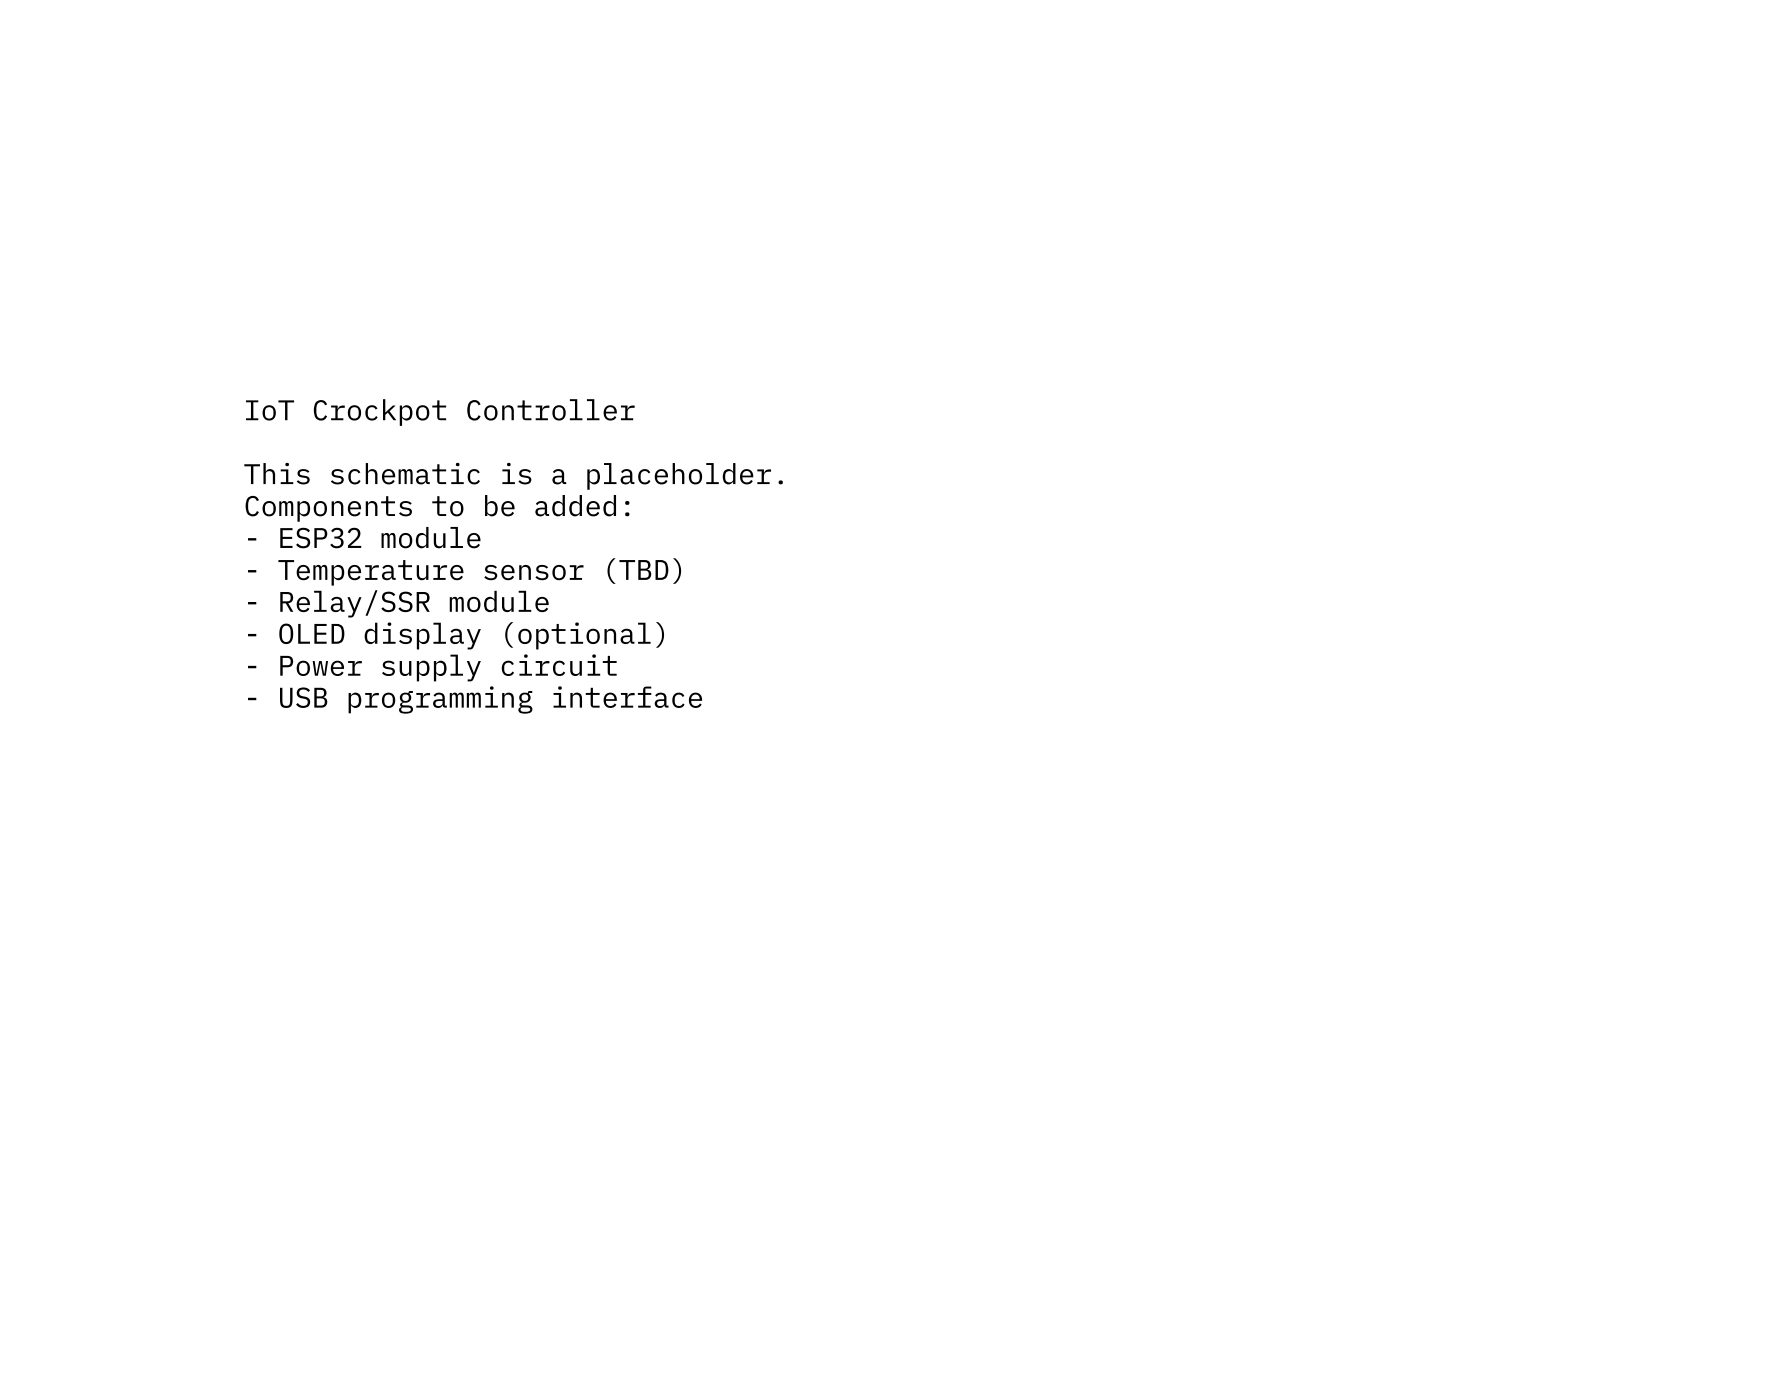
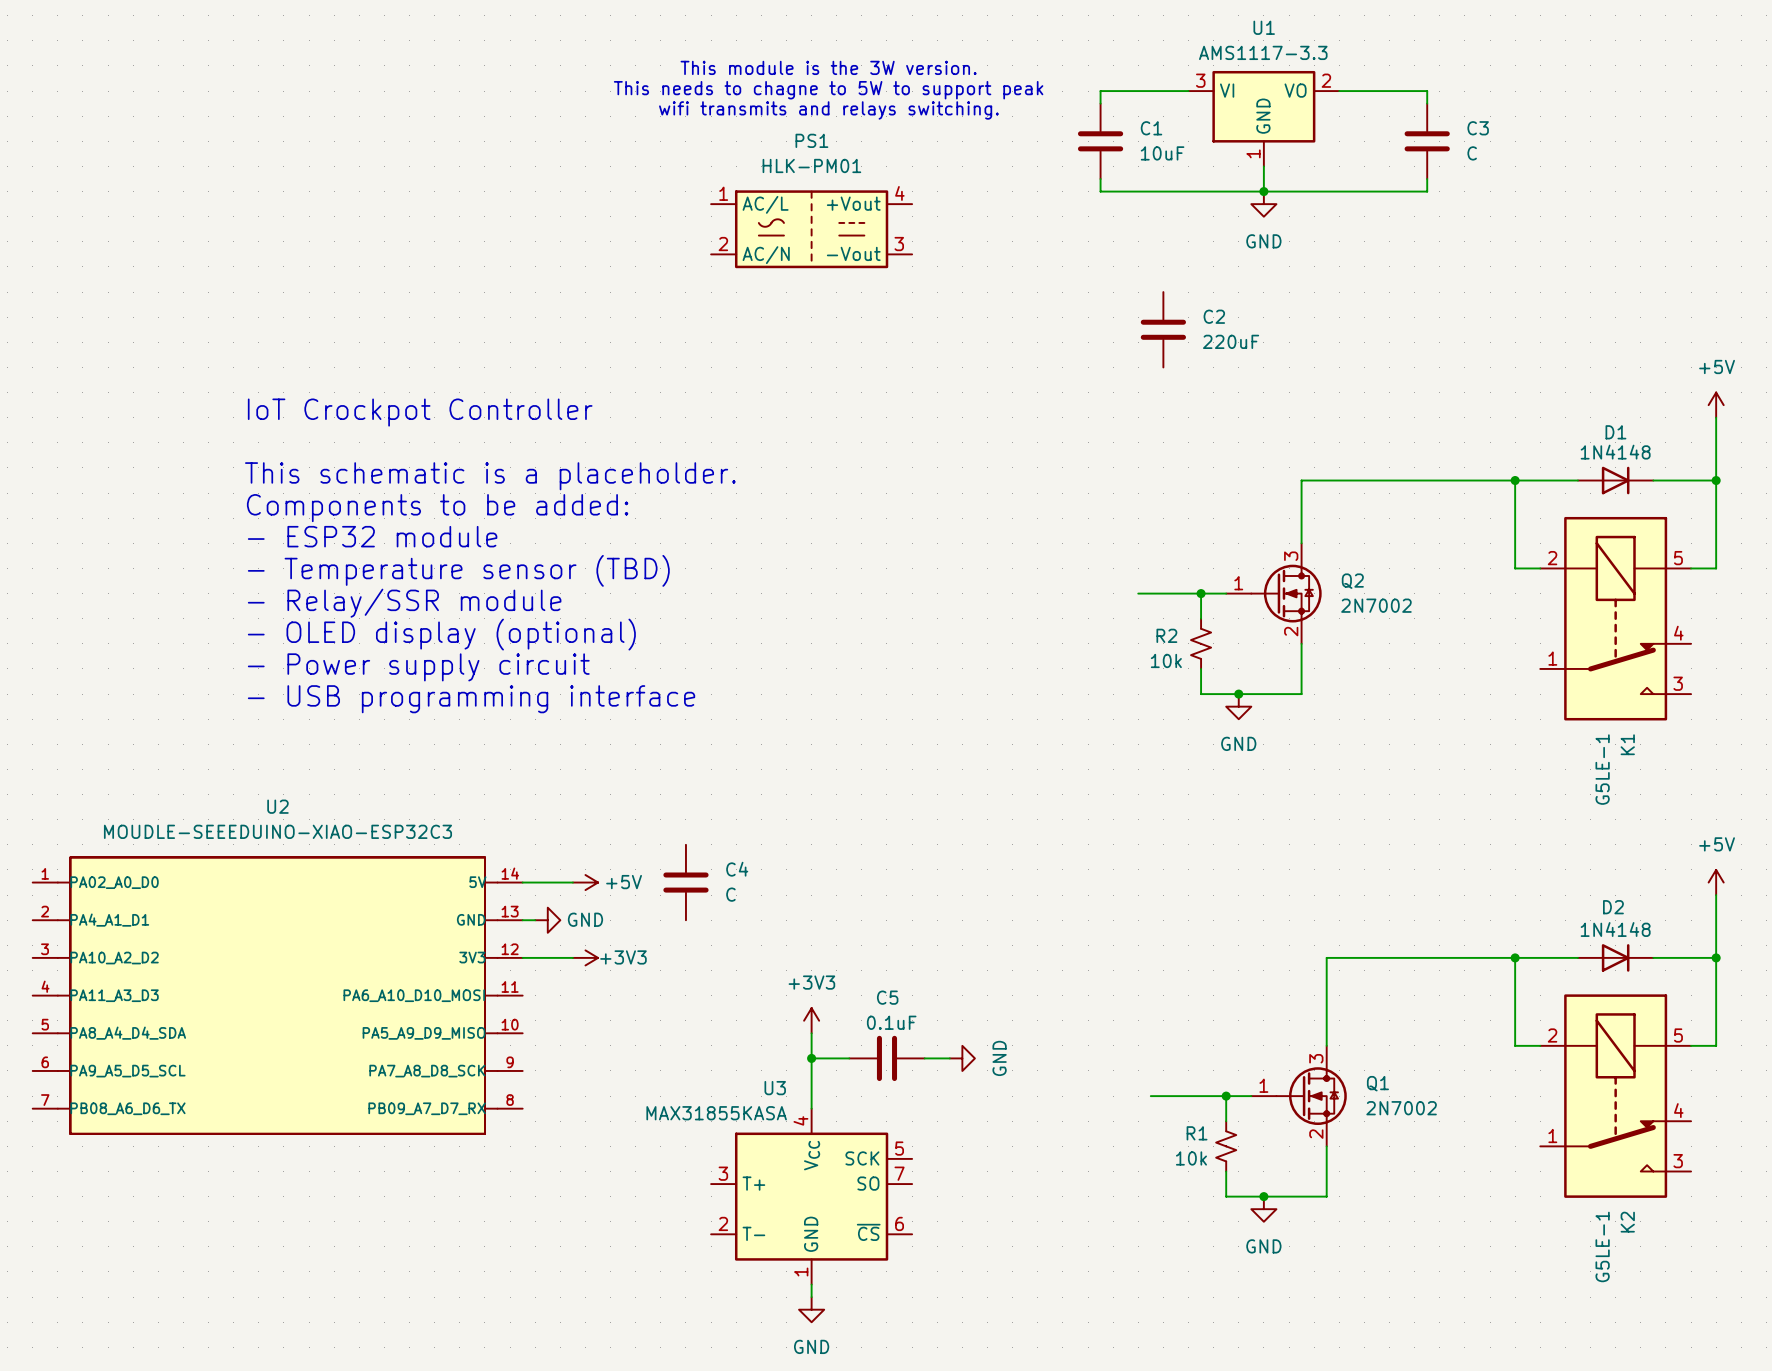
text: none -> This module is the 3W version. (828, 67)
text: none -> This needs to chagne to 5W to support peak (828, 90)
wire: none -> (1188, 91) (1100, 91) (1100, 103)
wire: none -> (1339, 91) (1427, 91) (1427, 103)
text: none -> wifi transmits and relays switching. (828, 110)
U1: none -> AMS1117-3.3 (1263, 118)
C1: none -> 10uF (1100, 141)
C3: none -> C (1427, 141)
wire: none -> (1263, 166) (1263, 191)
wire: none -> (1100, 179) (1100, 191) (1427, 191) (1427, 179)
junction: none -> (1263, 191)
power symbol: none -> GND (1263, 204)
PS1: none -> HLK-PM01 (811, 229)
C2: none -> 220uF (1163, 329)
power symbol: none -> +5V (1716, 405)
wire: none -> (1716, 417) (1716, 568) (1691, 568)
wire: none -> (1515, 480) (1515, 568) (1540, 568)
junction: none -> (1515, 480)
wire: none -> (1577, 480) (1301, 480) (1301, 543)
D1: none -> 1N4148 (1615, 480)
wire: none -> (1653, 480) (1716, 480)
junction: none -> (1716, 480)
wire: none -> (1138, 593) (1226, 593)
wire: none -> (1201, 593) (1201, 618)
junction: none -> (1201, 593)
Q2: none -> 2N7002 (1273, 593)
K1: none -> G5LE-1 (1615, 618)
R2: none -> 10k (1201, 643)
wire: none -> (1301, 643) (1301, 694) (1201, 694) (1201, 668)
junction: none -> (1238, 694)
power symbol: none -> GND (1238, 706)
wire: none -> (522, 882) (572, 882)
power symbol: none -> +5V (585, 882)
C4: none -> C (685, 882)
power symbol: none -> +5V (1716, 882)
wire: none -> (1716, 895) (1716, 1045) (1691, 1045)
wire: none -> (522, 920) (535, 920)
power symbol: none -> GND (547, 920)
wire: none -> (522, 957) (572, 957)
power symbol: none -> +3V3 (585, 957)
wire: none -> (1515, 957) (1515, 1045) (1540, 1045)
junction: none -> (1515, 957)
wire: none -> (1577, 957) (1326, 957) (1326, 1045)
D2: none -> 1N4148 (1615, 957)
wire: none -> (1653, 957) (1716, 957)
junction: none -> (1716, 957)
U2: none -> MOUDLE-SEEEDUINO-XIAO-ESP32C3 (277, 995)
power symbol: none -> +3V3 (811, 1020)
wire: none -> (811, 1033) (811, 1108)
wire: none -> (811, 1058) (849, 1058)
junction: none -> (811, 1058)
C5: none -> 0.1uF (886, 1058)
wire: none -> (924, 1058) (949, 1058)
power symbol: none -> GND (962, 1058)
wire: none -> (1150, 1096) (1251, 1096)
wire: none -> (1226, 1096) (1226, 1121)
junction: none -> (1226, 1096)
Q1: none -> 2N7002 (1299, 1096)
K2: none -> G5LE-1 (1615, 1096)
R1: none -> 10k (1226, 1146)
wire: none -> (1326, 1146) (1326, 1196) (1226, 1196) (1226, 1171)
U3: none -> MAX31855KASA (811, 1196)
junction: none -> (1263, 1196)
power symbol: none -> GND (1263, 1209)
wire: none -> (811, 1284) (811, 1297)
power symbol: none -> GND (811, 1309)

